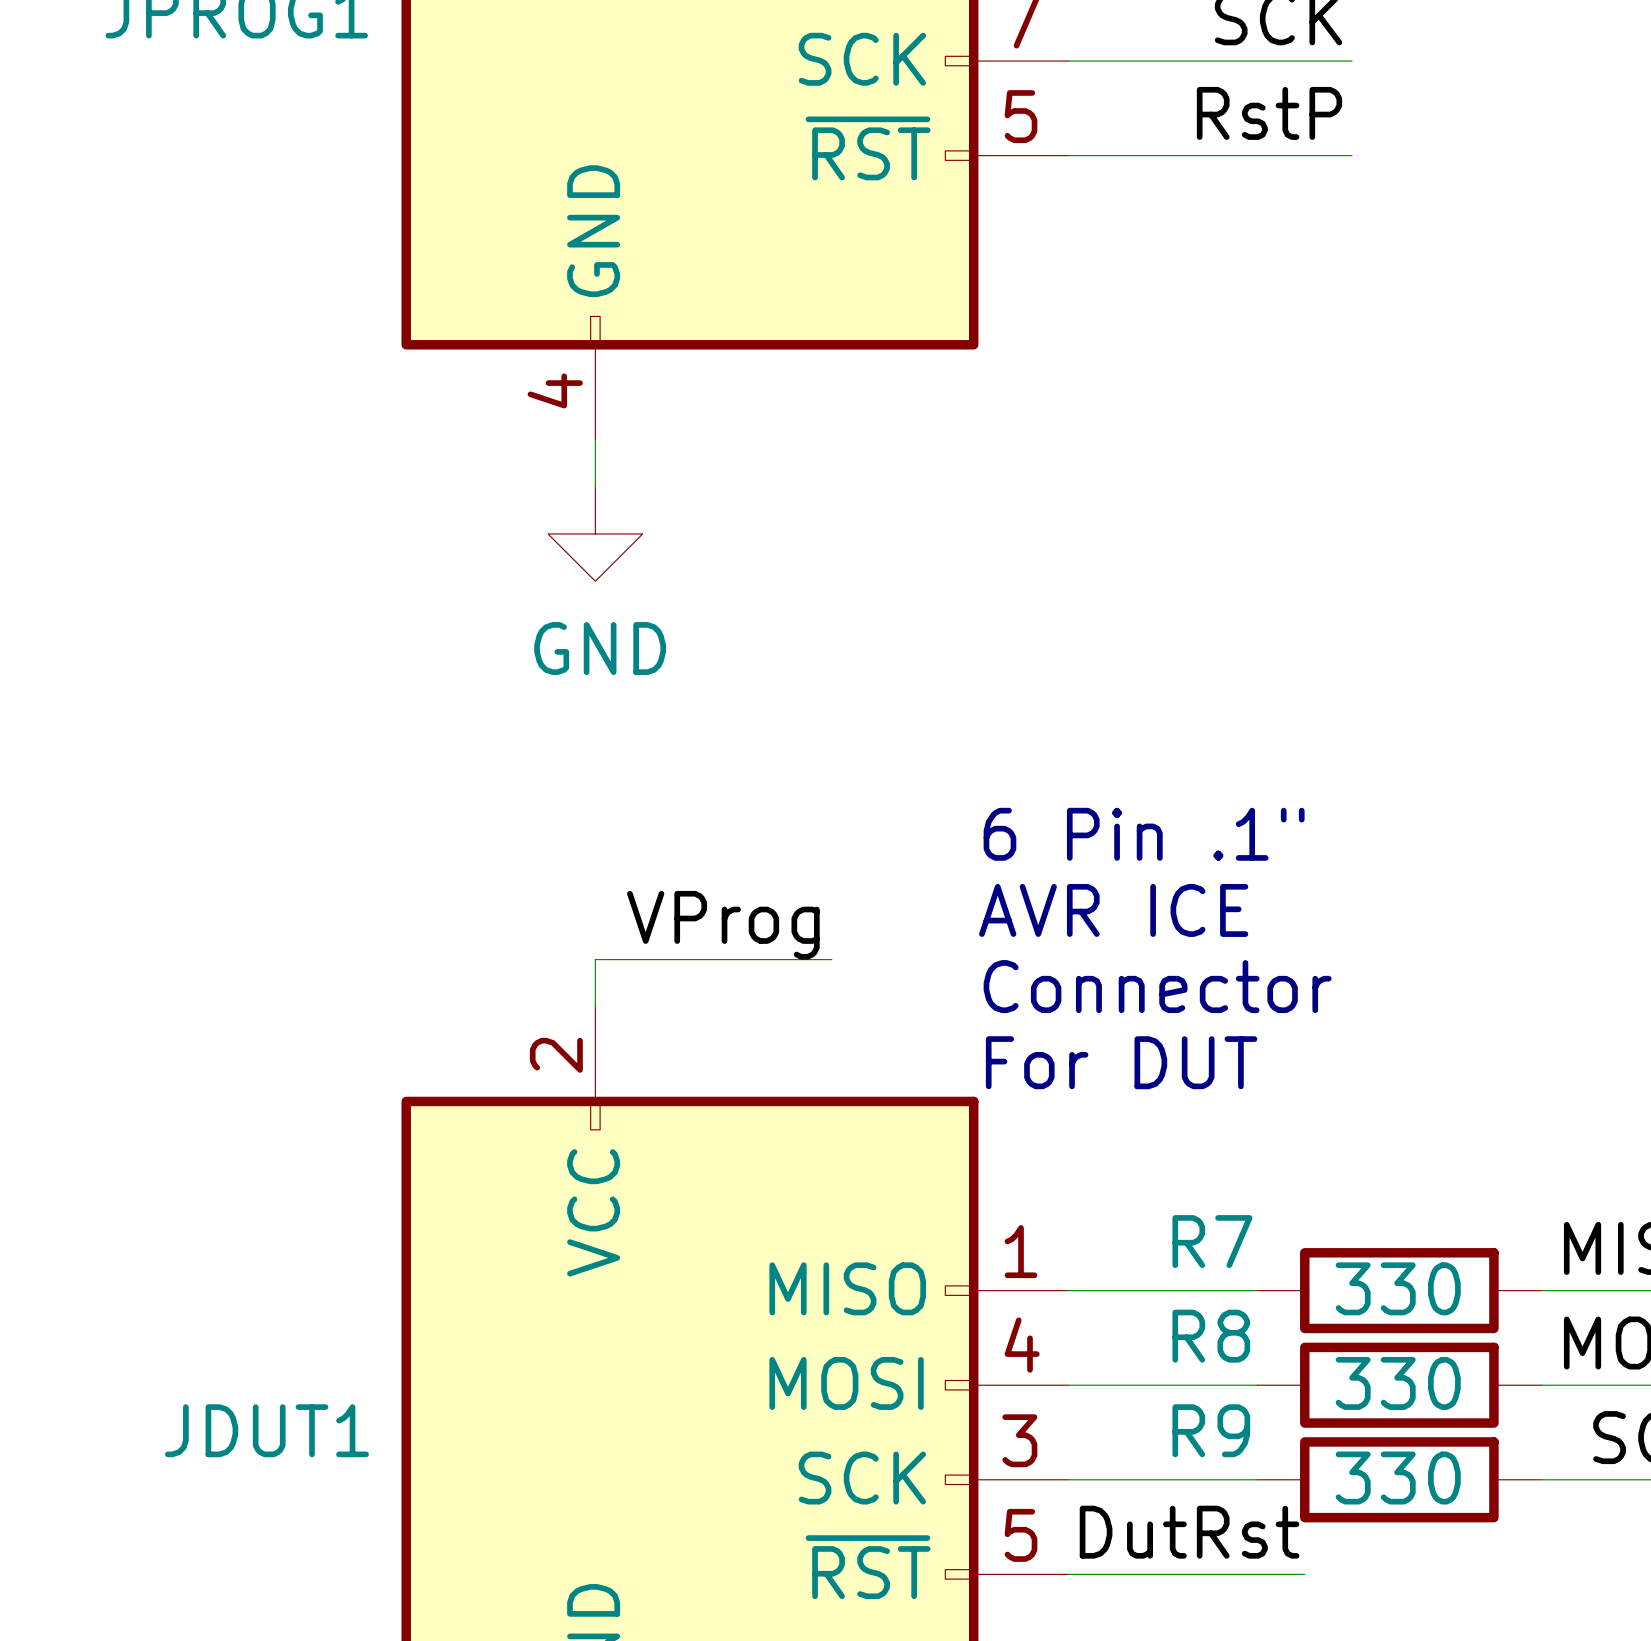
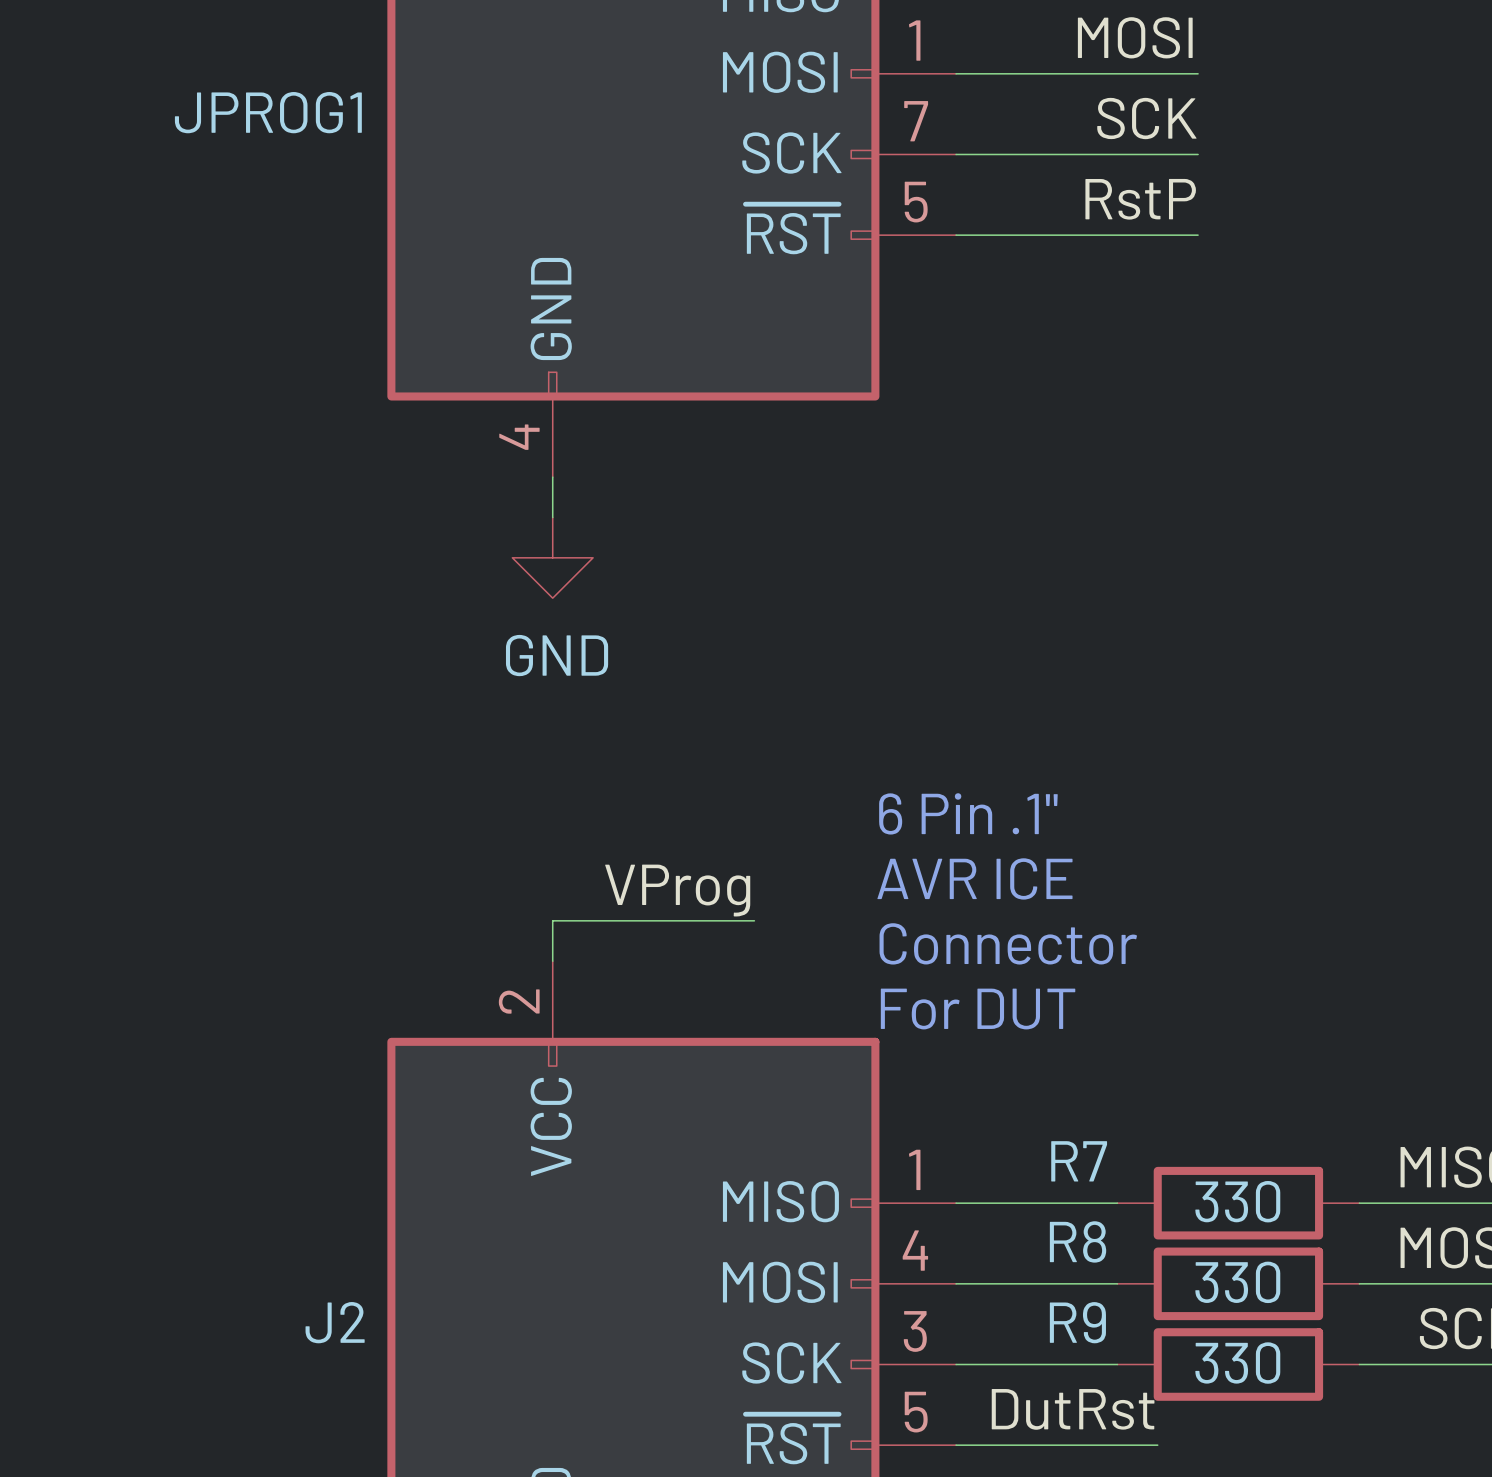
JDUT1 name: JDUT1 (266, 1430) -> J2 (335, 1322)

